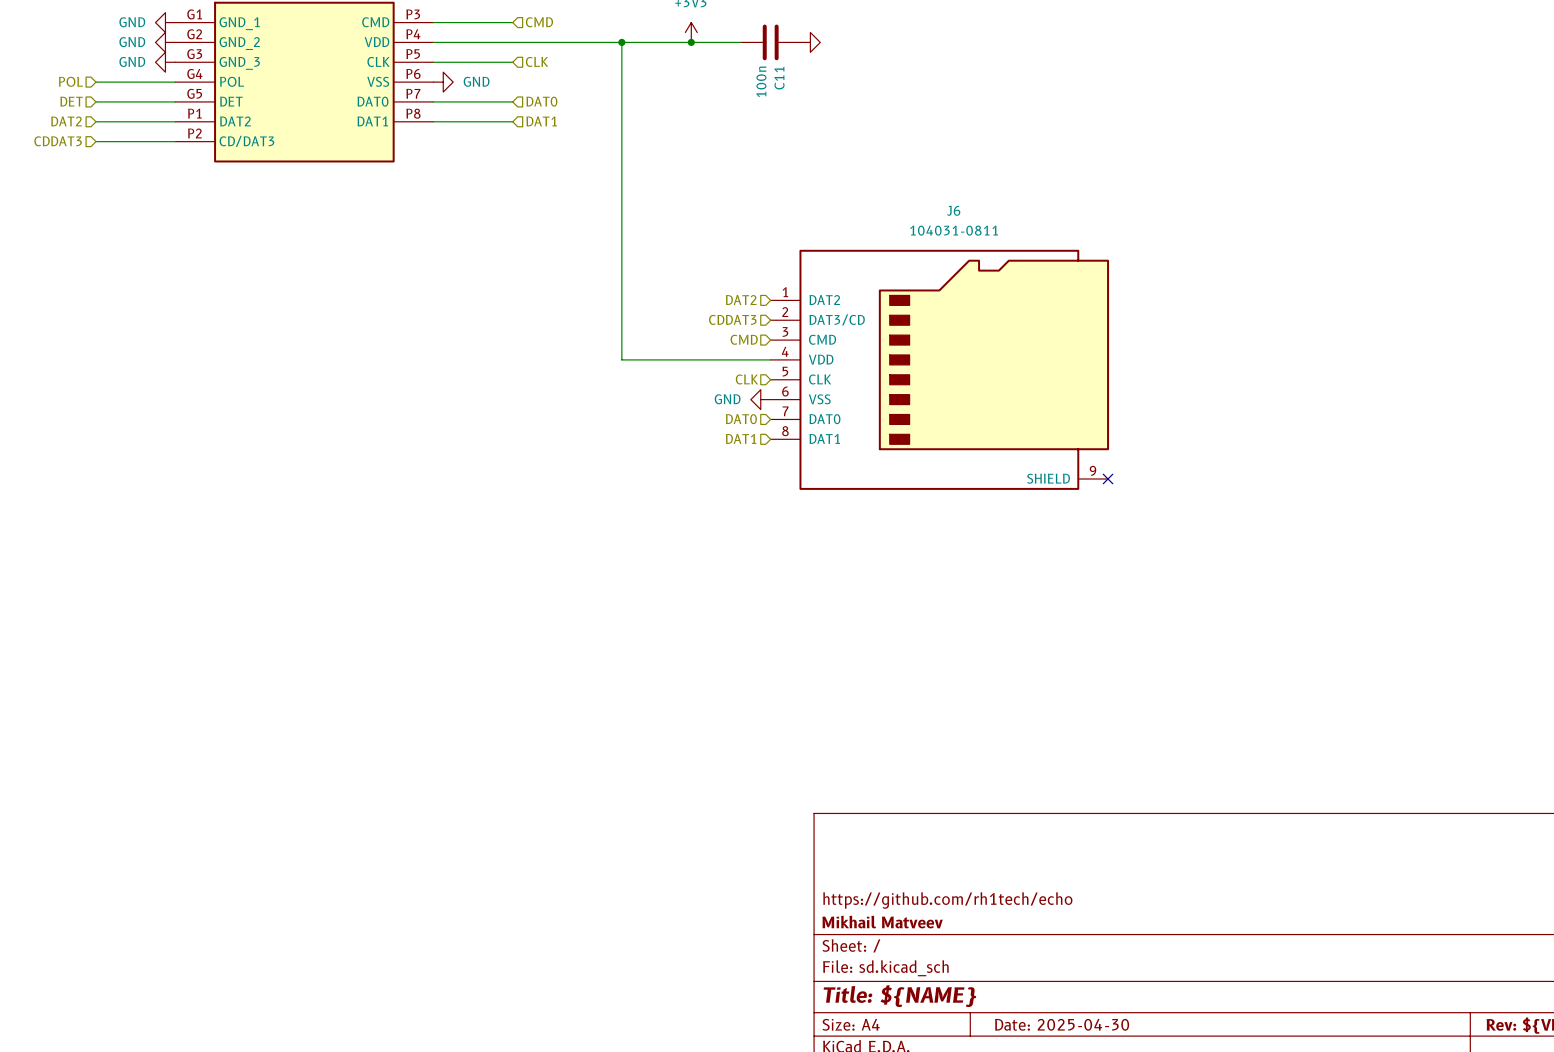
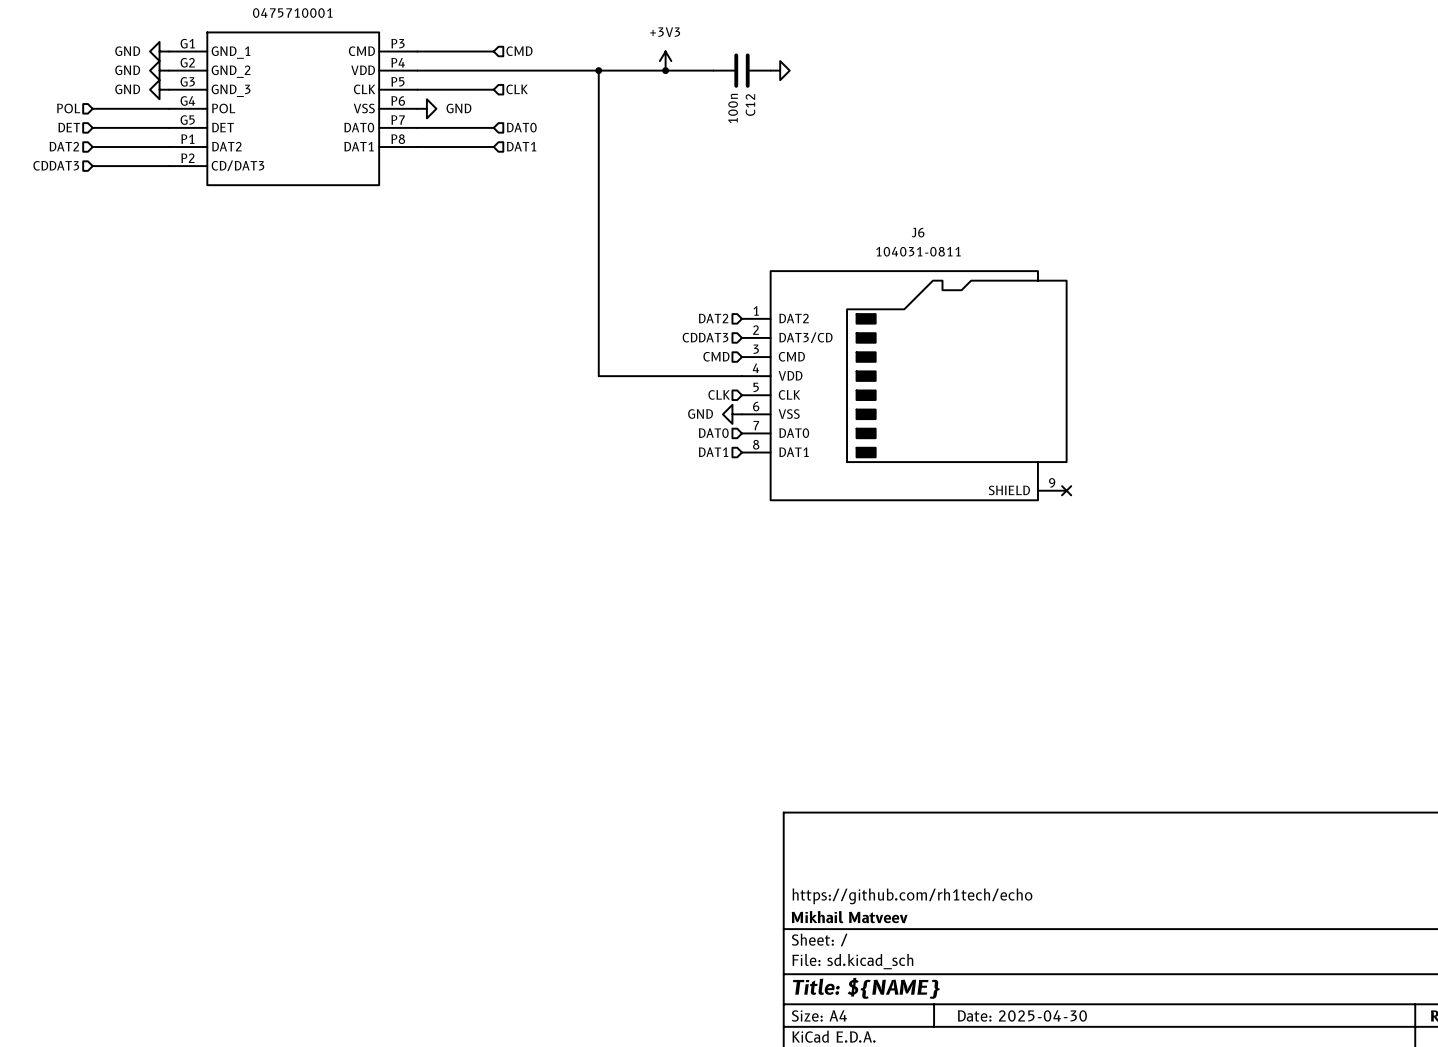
C11 name: C11 (779, 78) -> C12 (750, 104)

